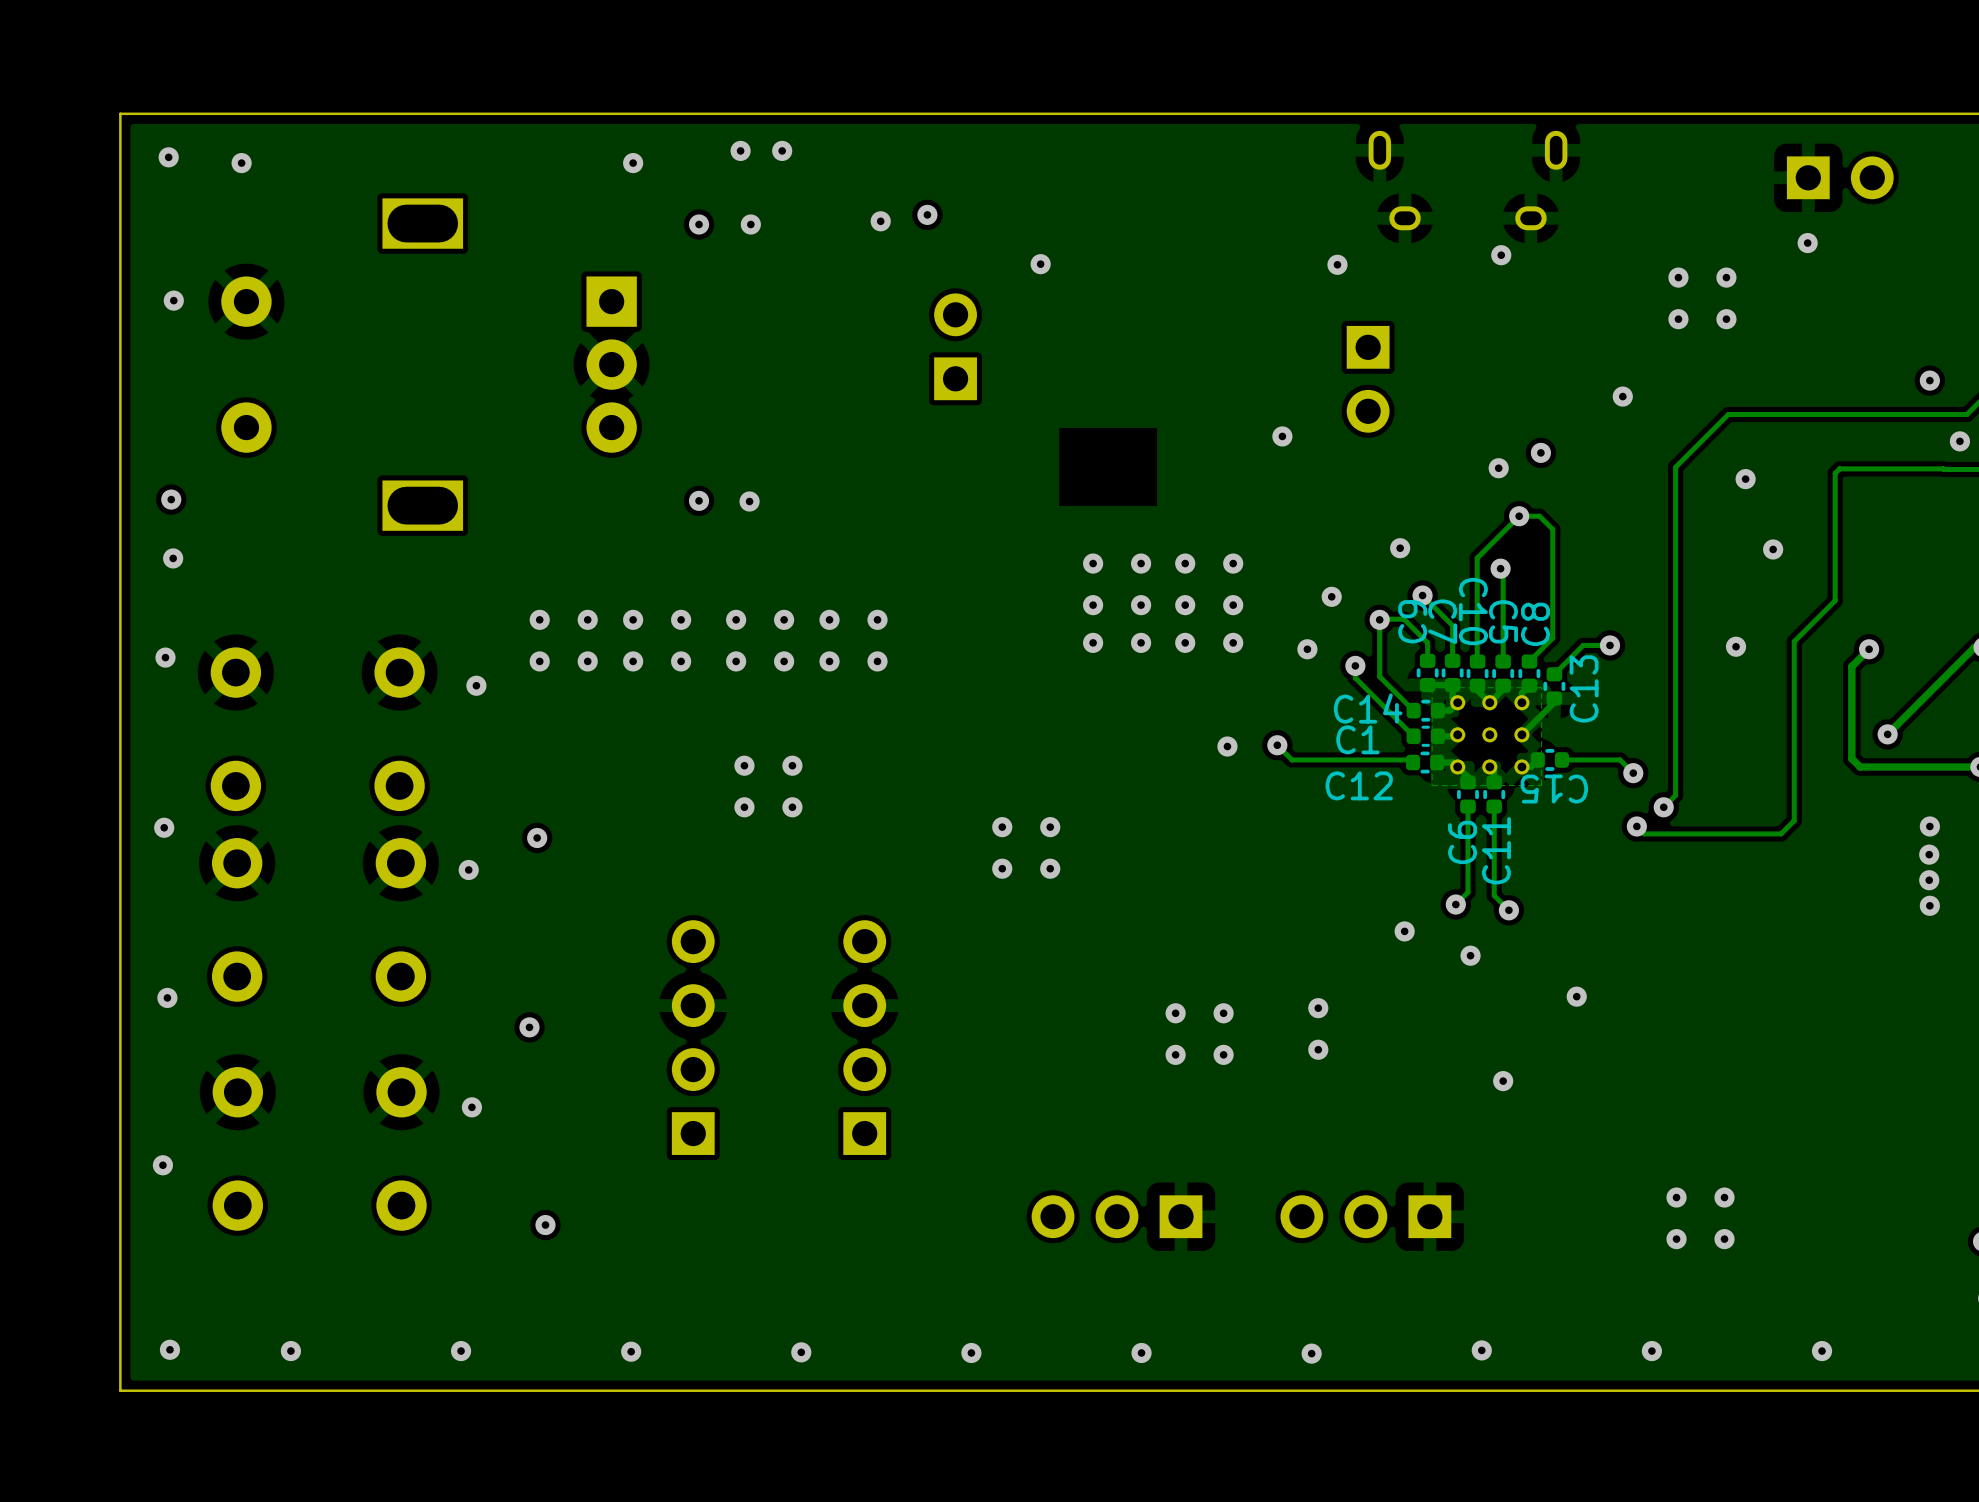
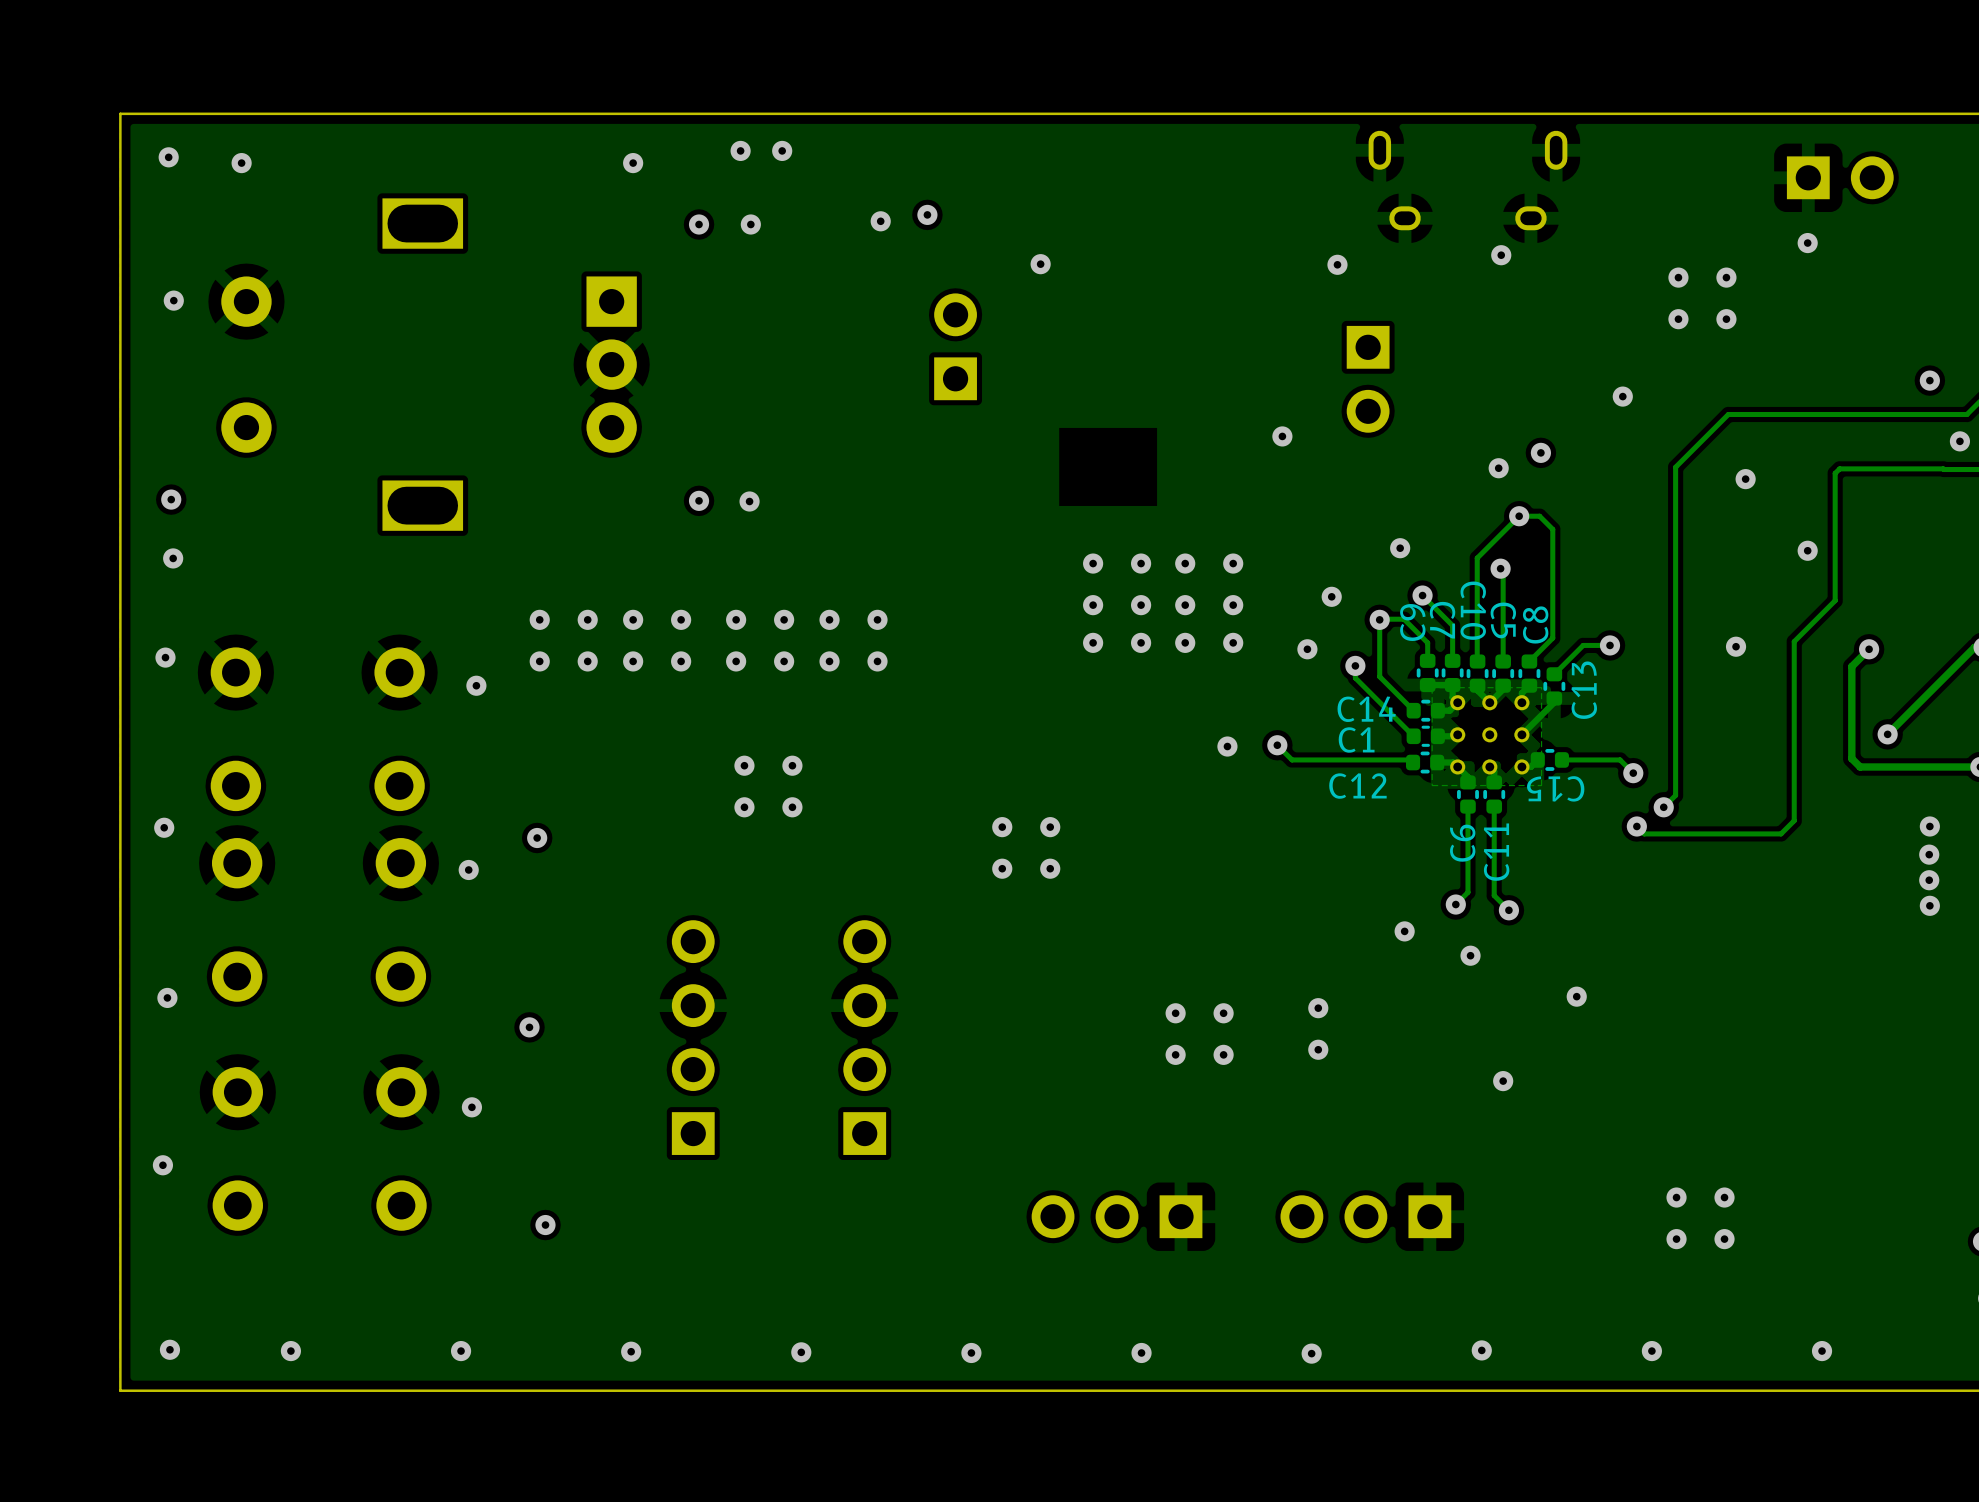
via position: (1773, 549) -> (1807, 550)

